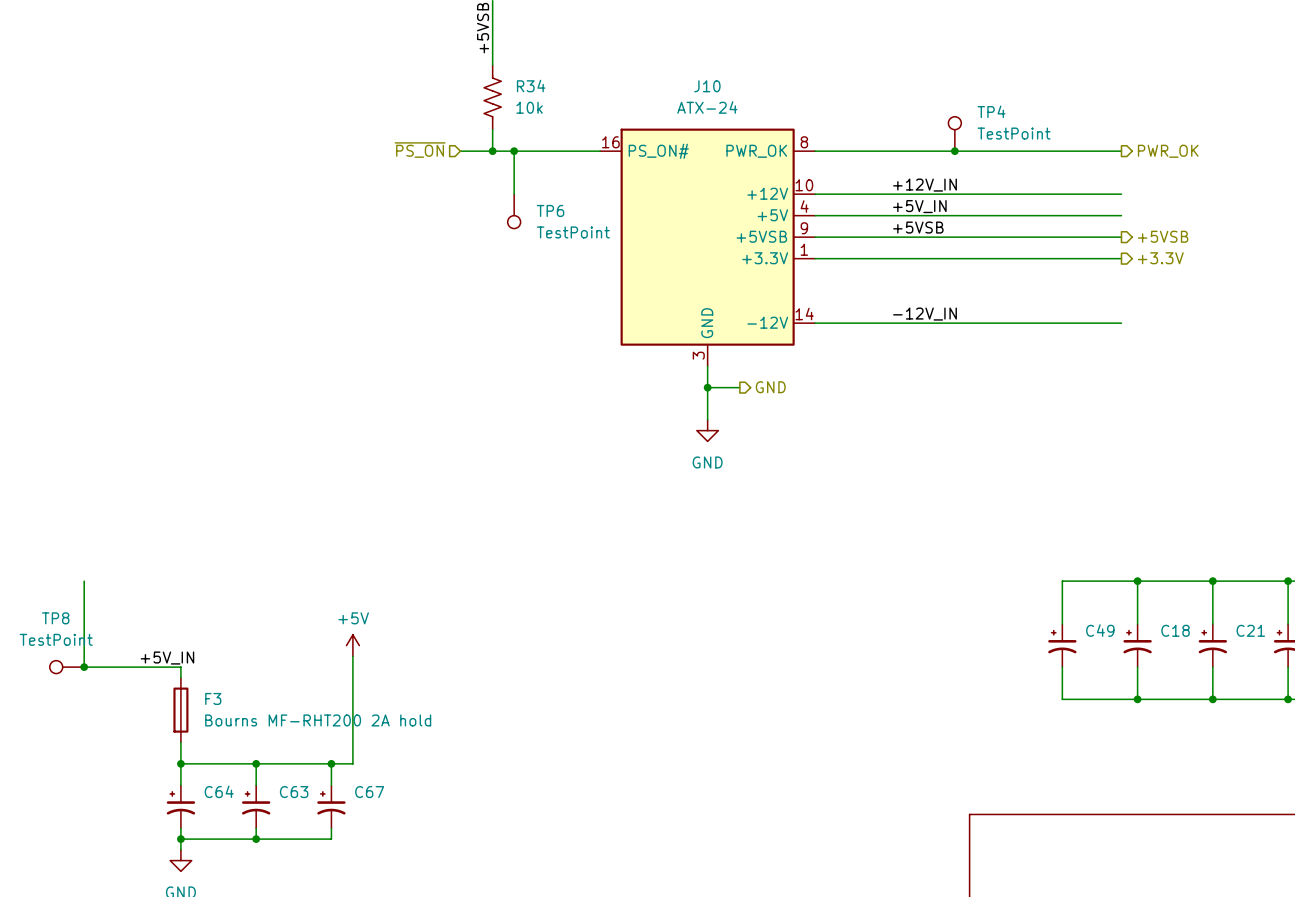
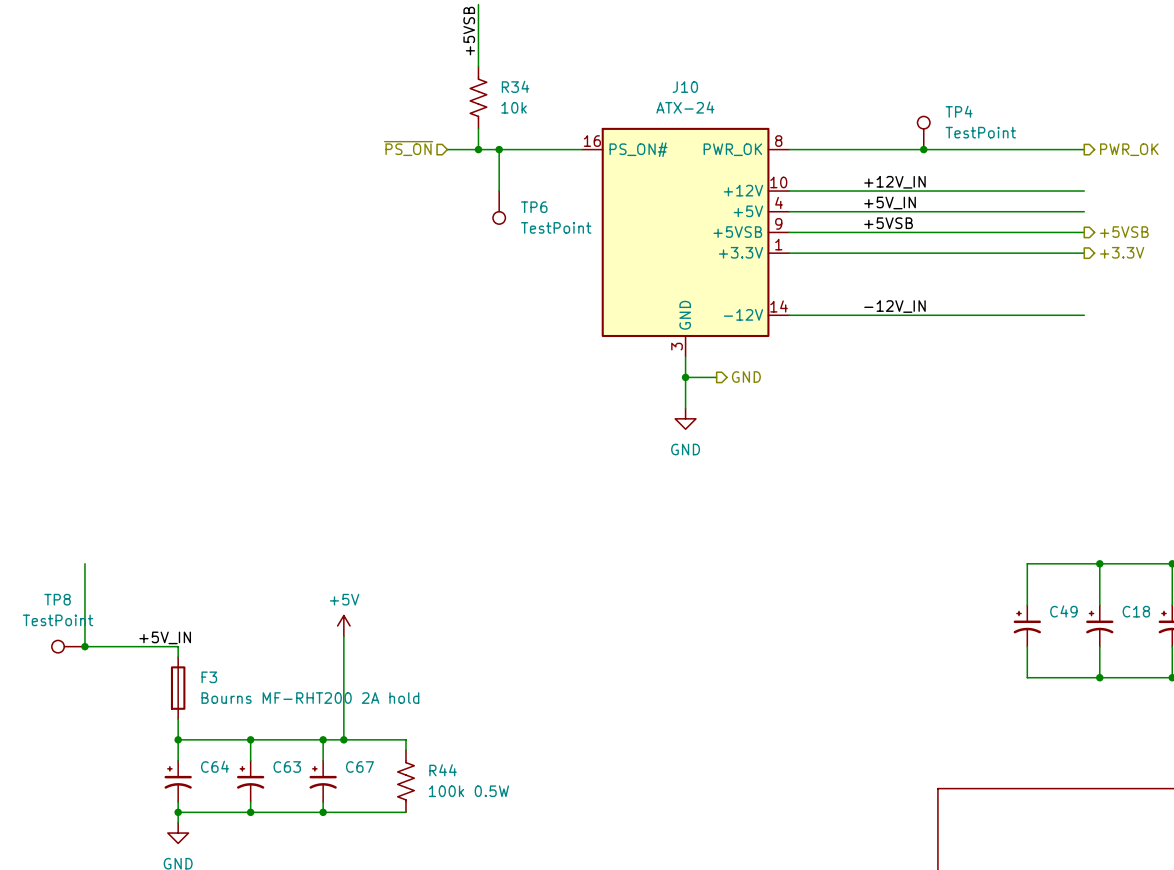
wire: none -> (343, 739) (405, 739) (405, 750)
junction: none -> (343, 739)
R44: none -> 100k 0.5W (405, 781)
wire: none -> (323, 812) (405, 812)
junction: none -> (323, 812)

